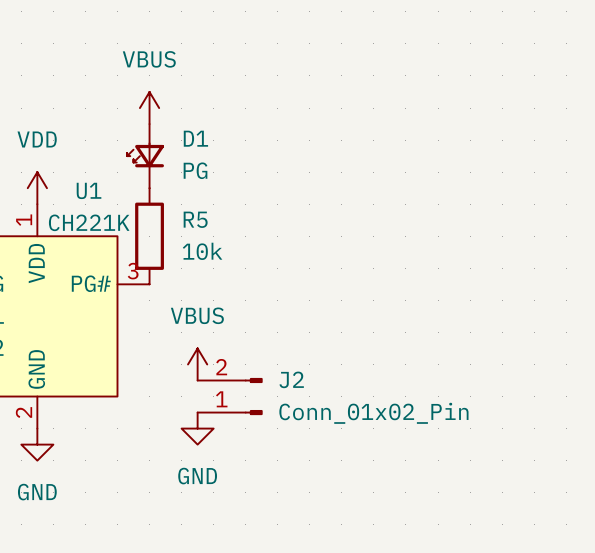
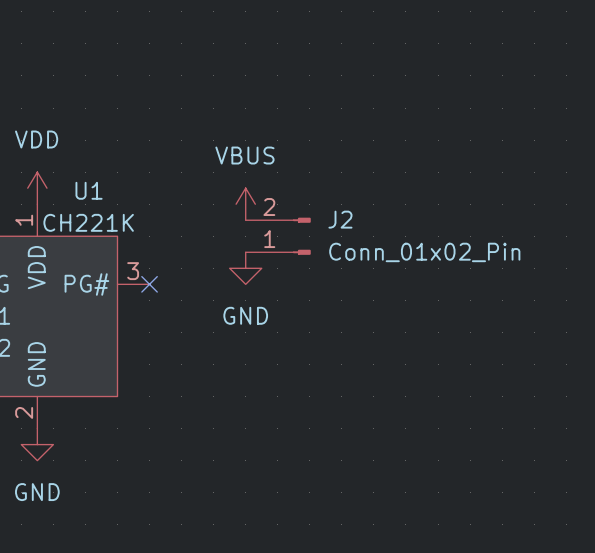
power symbol: VBUS (149, 108) -> none
D1: PG (145, 156) -> none
power symbol: none -> VBUS (245, 204)
R5: 10k (149, 236) -> none
no-connect mark: none -> (149, 284)
power symbol: VBUS (197, 364) -> none
J2 position: (230, 396) -> (278, 236)
power symbol position: GND (197, 428) -> GND (245, 268)

